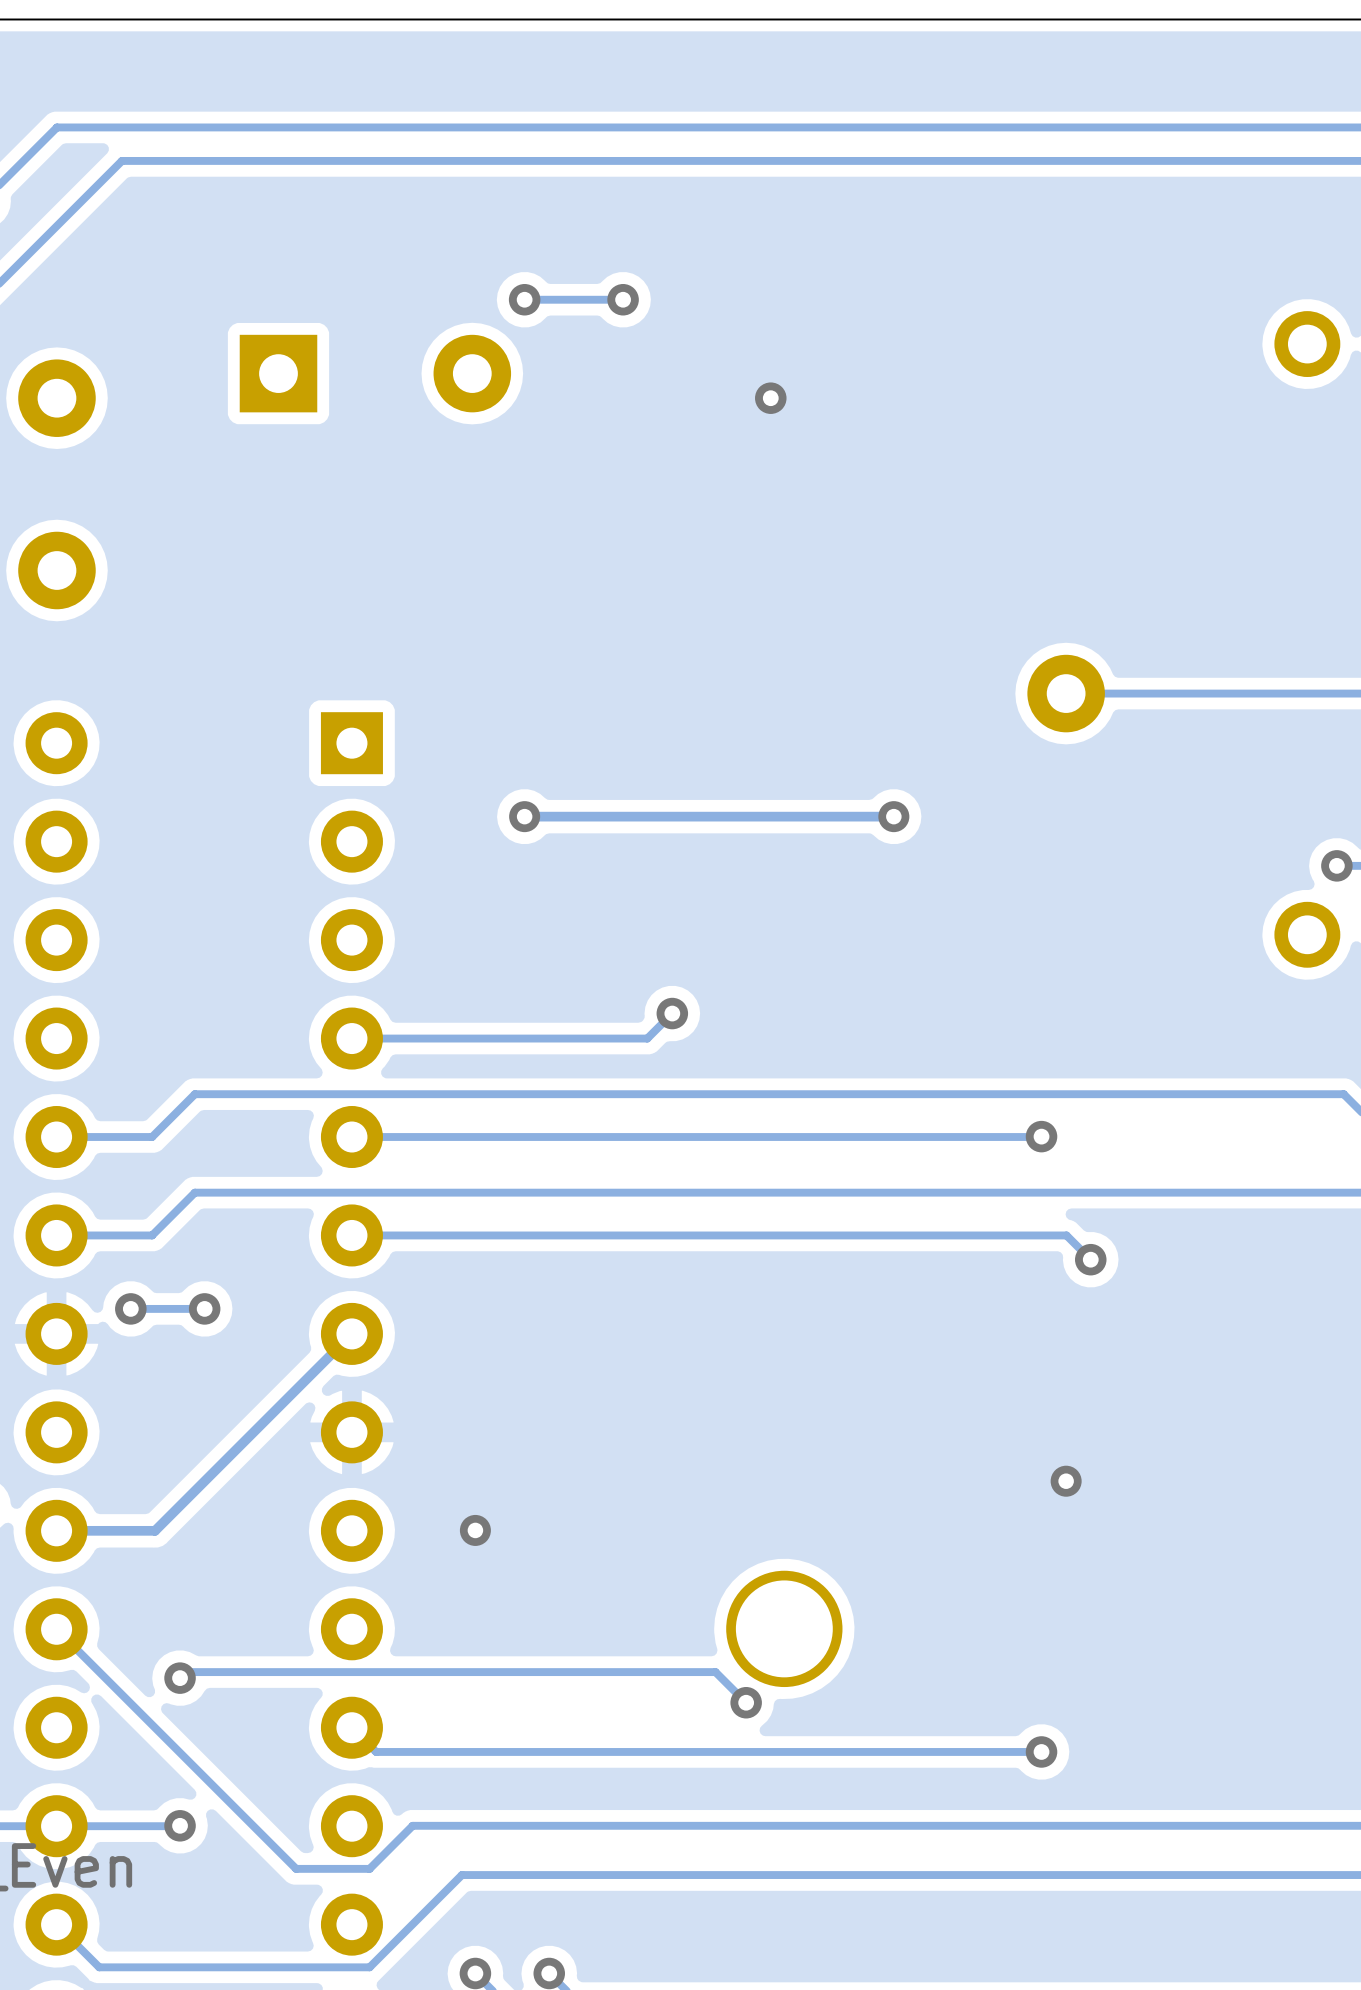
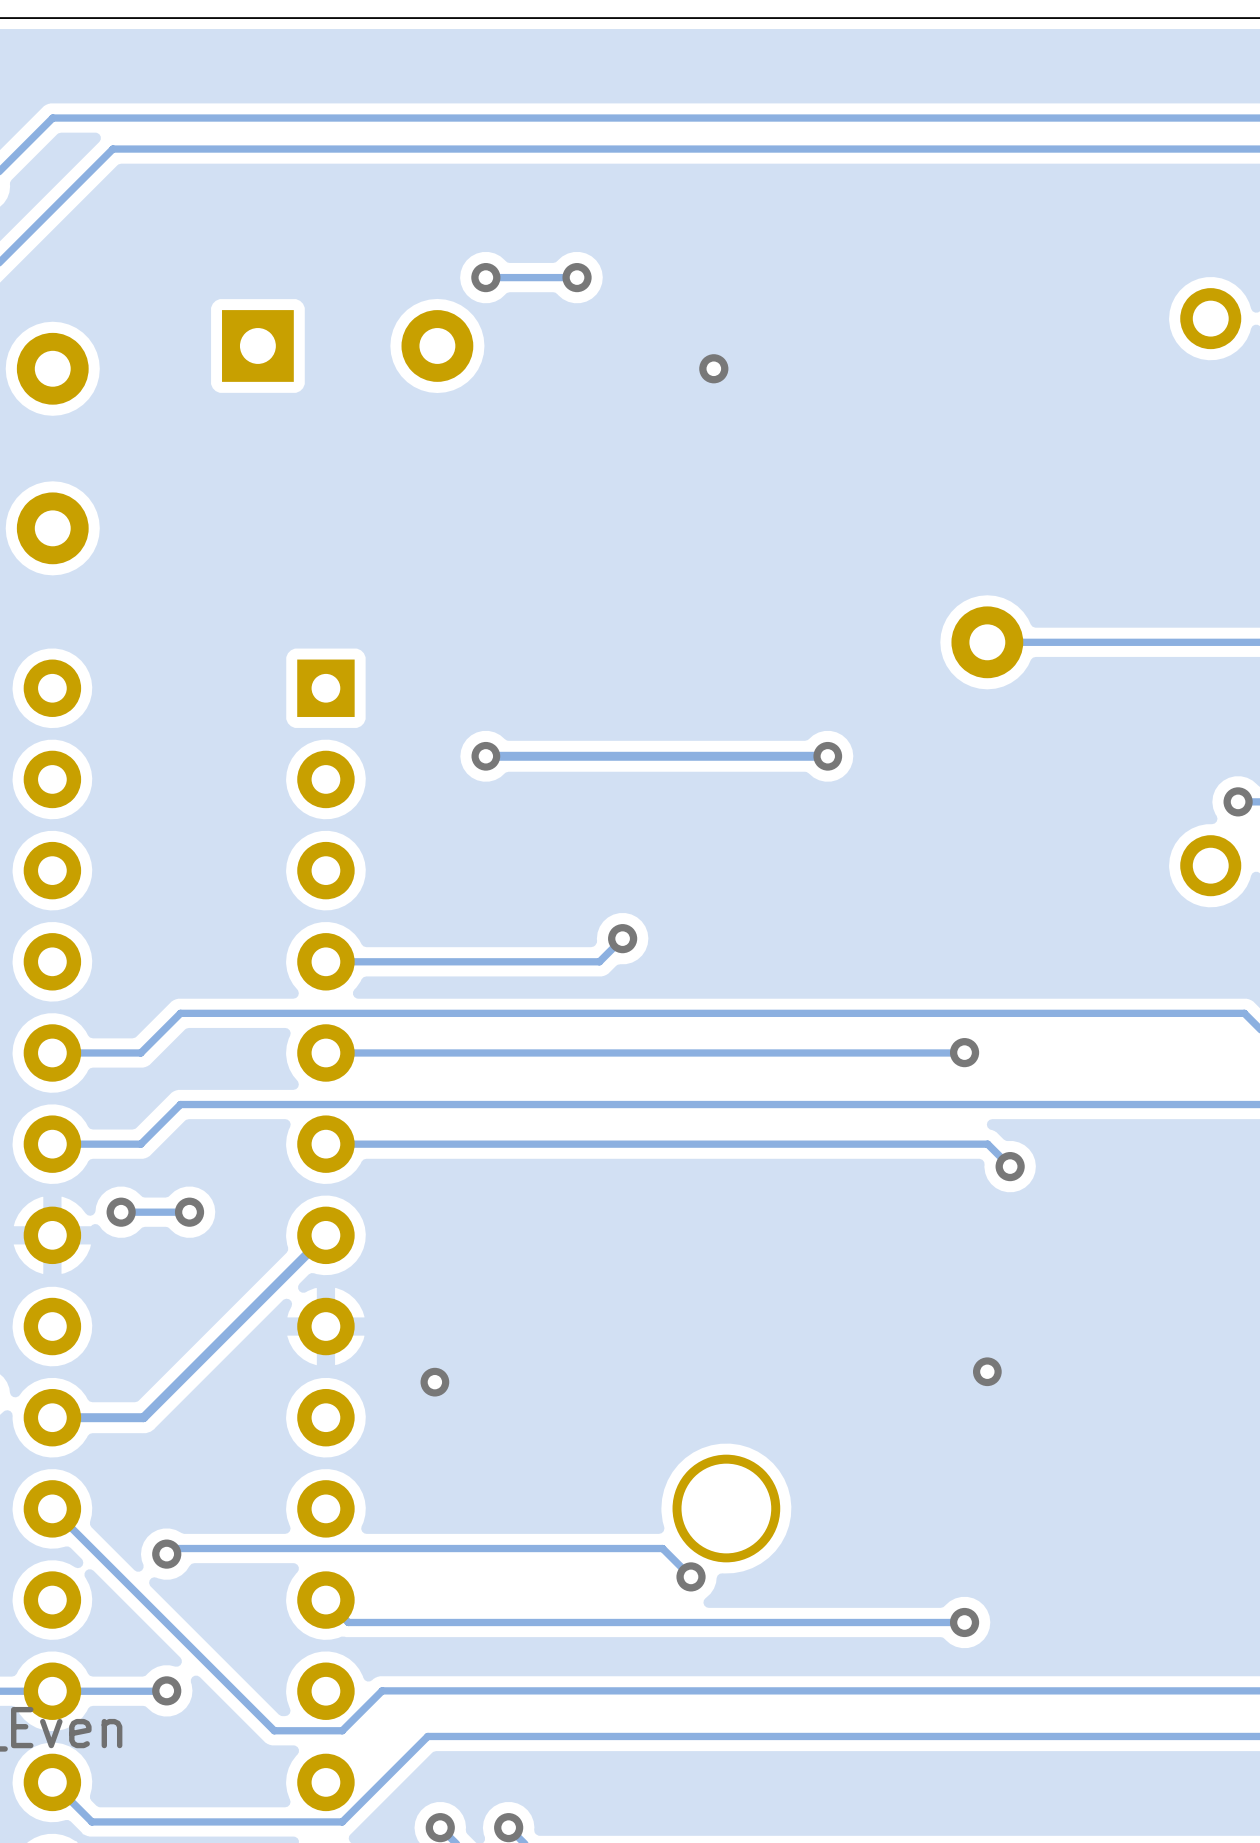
via position: (475, 1530) -> (434, 1382)

